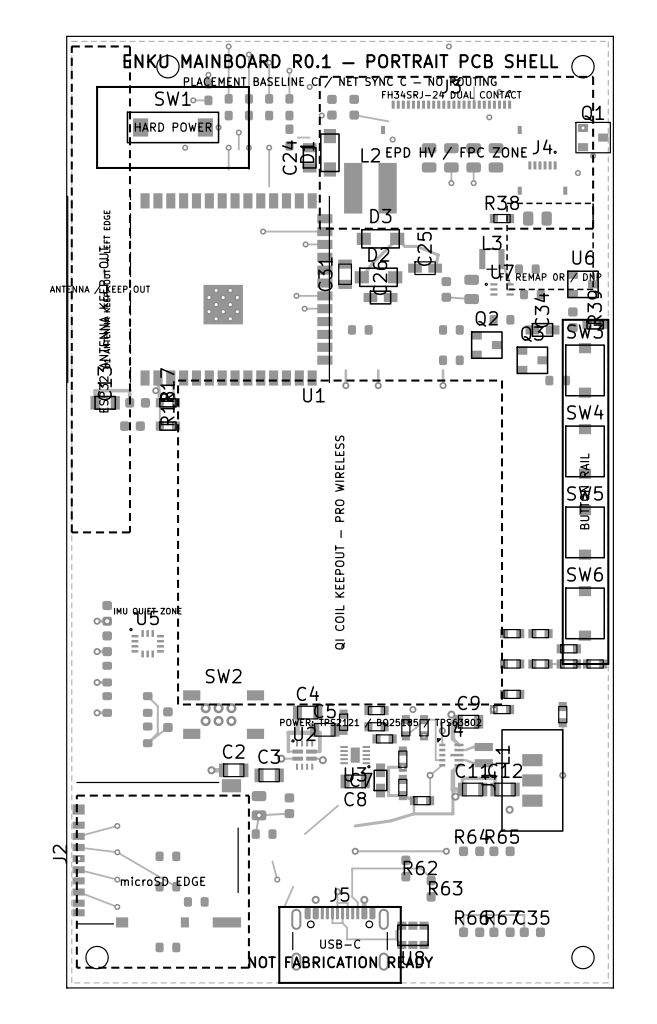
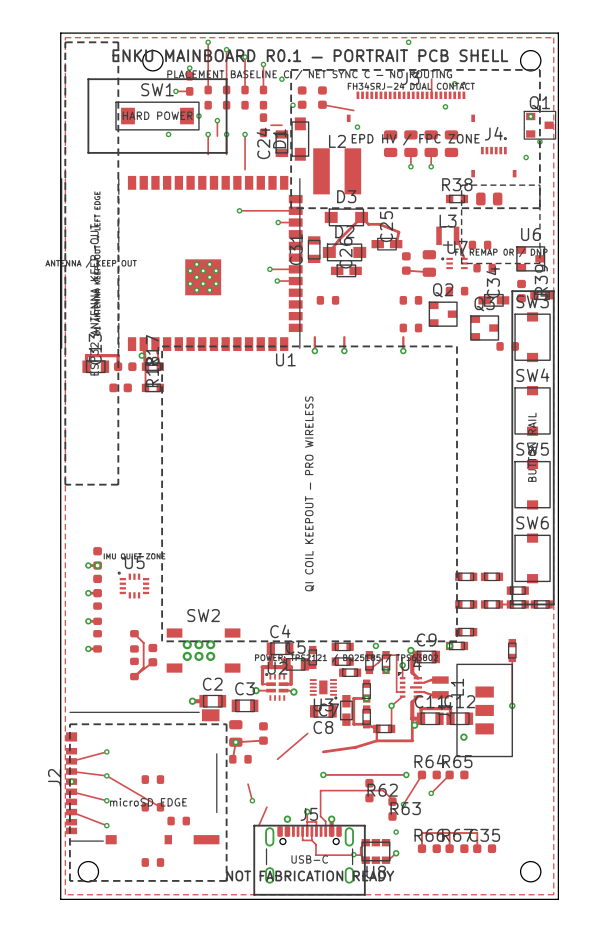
track: none -> (421, 774) (403, 804)
track: none -> (449, 774) (431, 793)
via: none -> (431, 793)
via: none -> (403, 804)
via: none -> (396, 832)
track: none -> (396, 853) (386, 860)
via: none -> (396, 853)
via: none -> (353, 854)

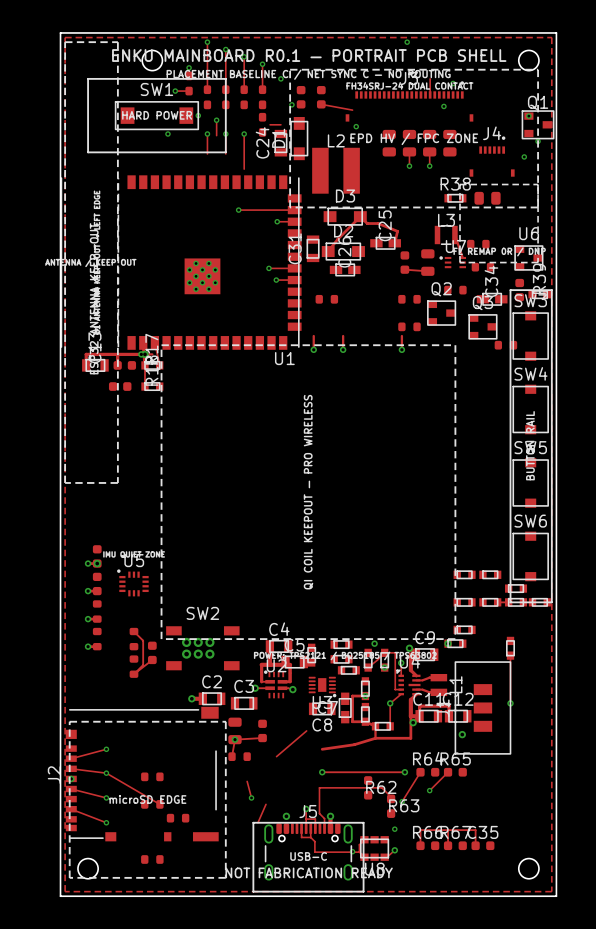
track: none -> (117, 354) (152, 354)
via: none -> (145, 354)

